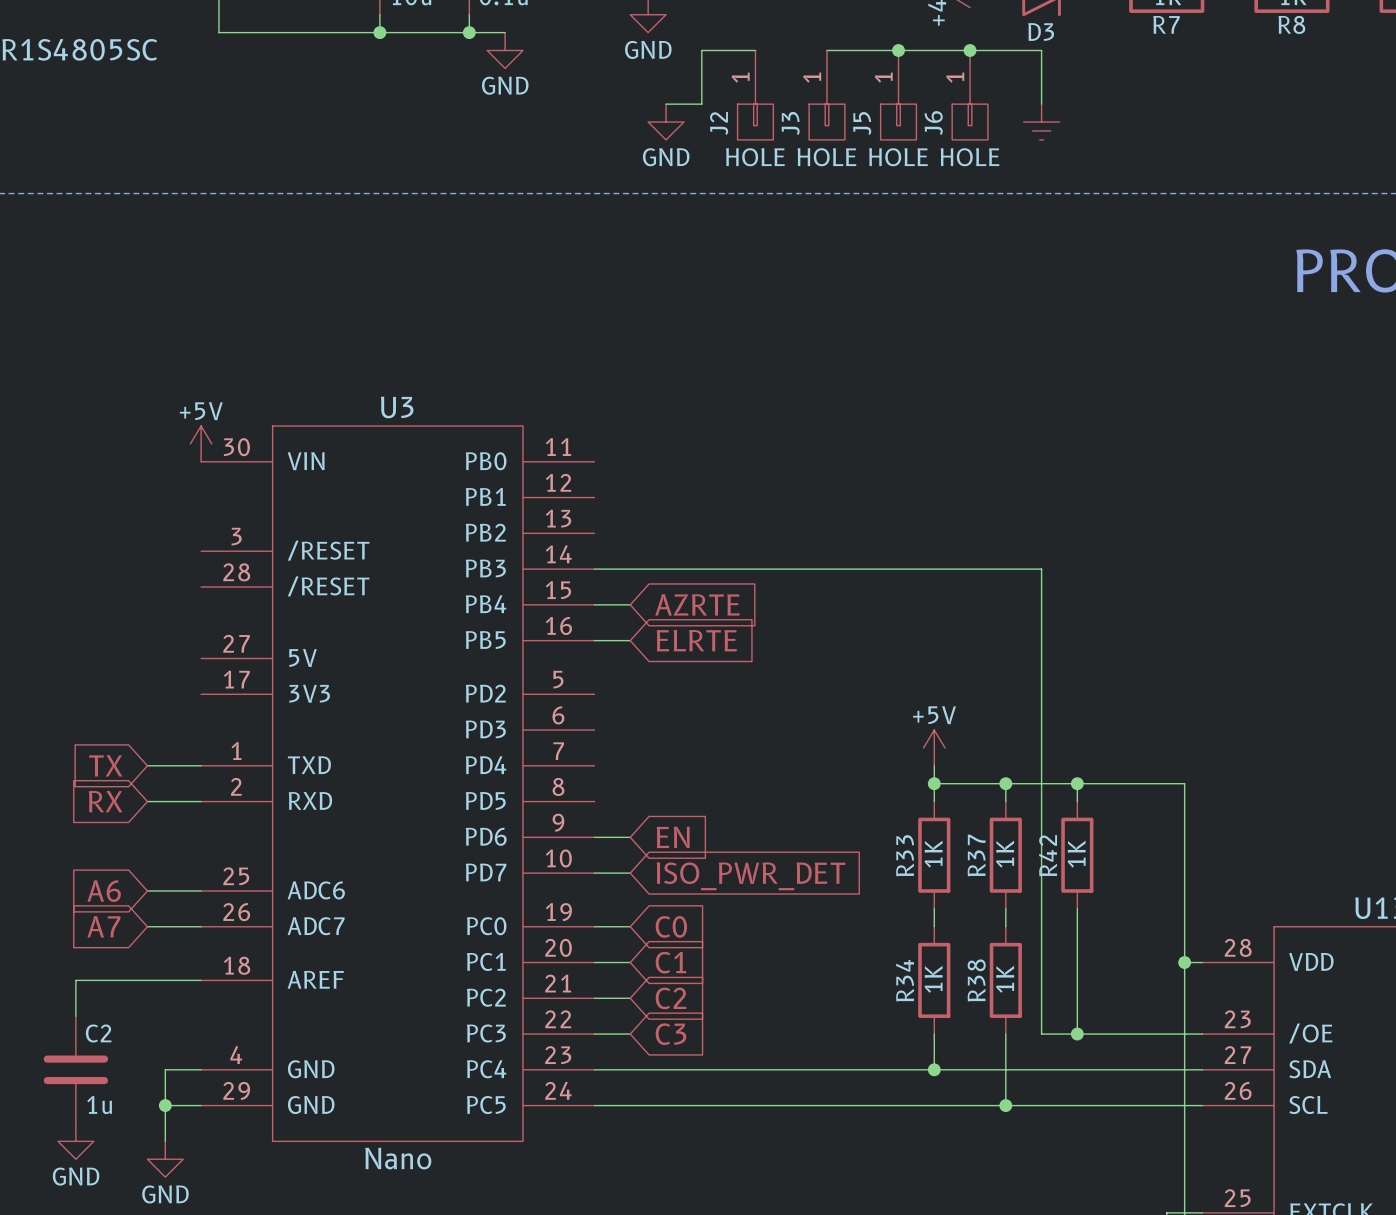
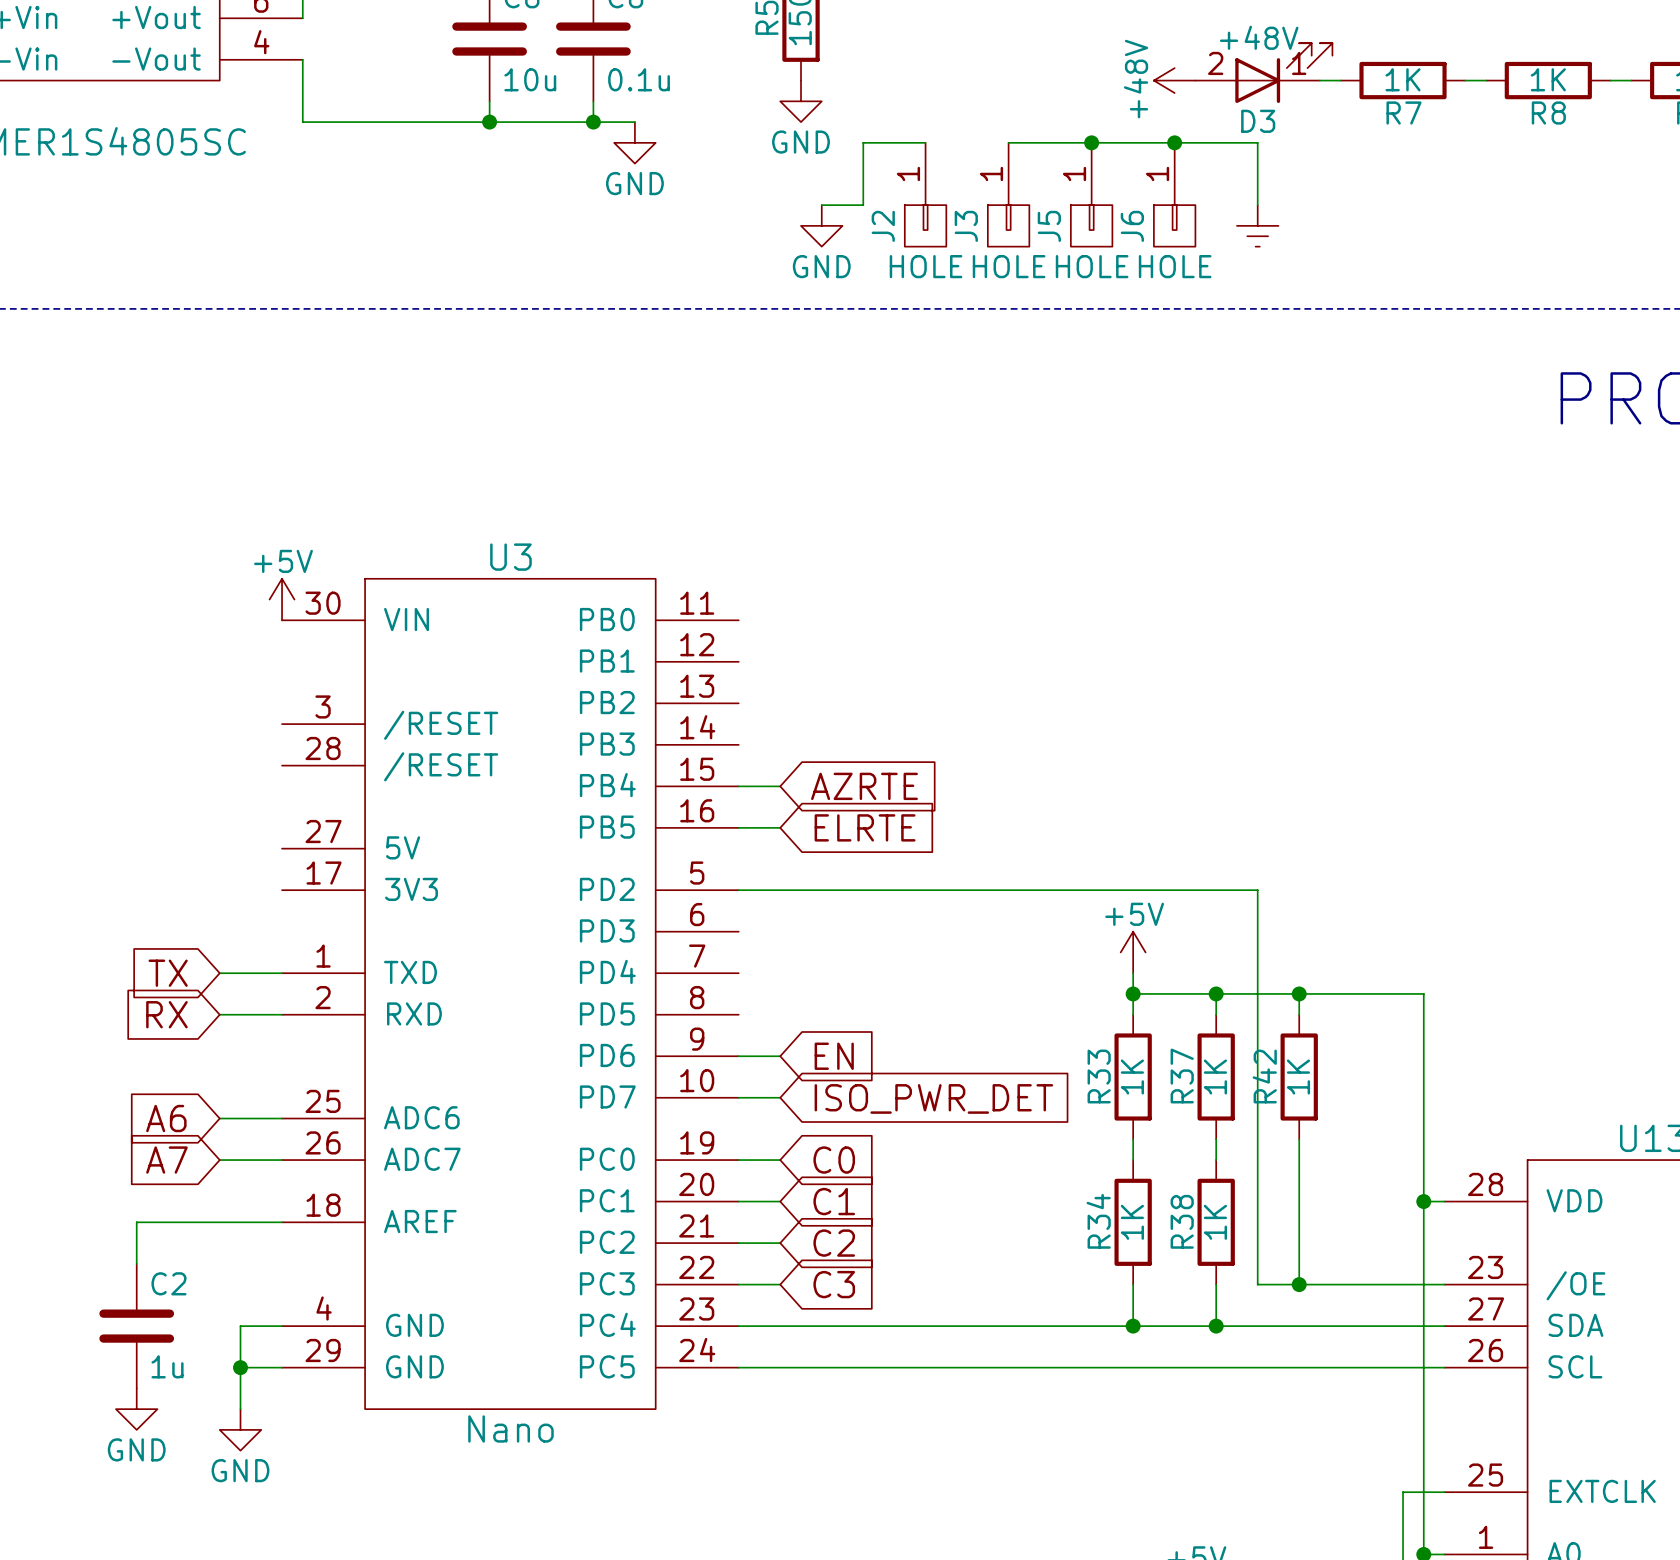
wire: (594, 569) (1041, 569) (1041, 694) -> (738, 890) (1257, 890)
wire: (1005, 1069) (1005, 1105) -> none
junction position: (1005, 1105) -> (1216, 1326)

